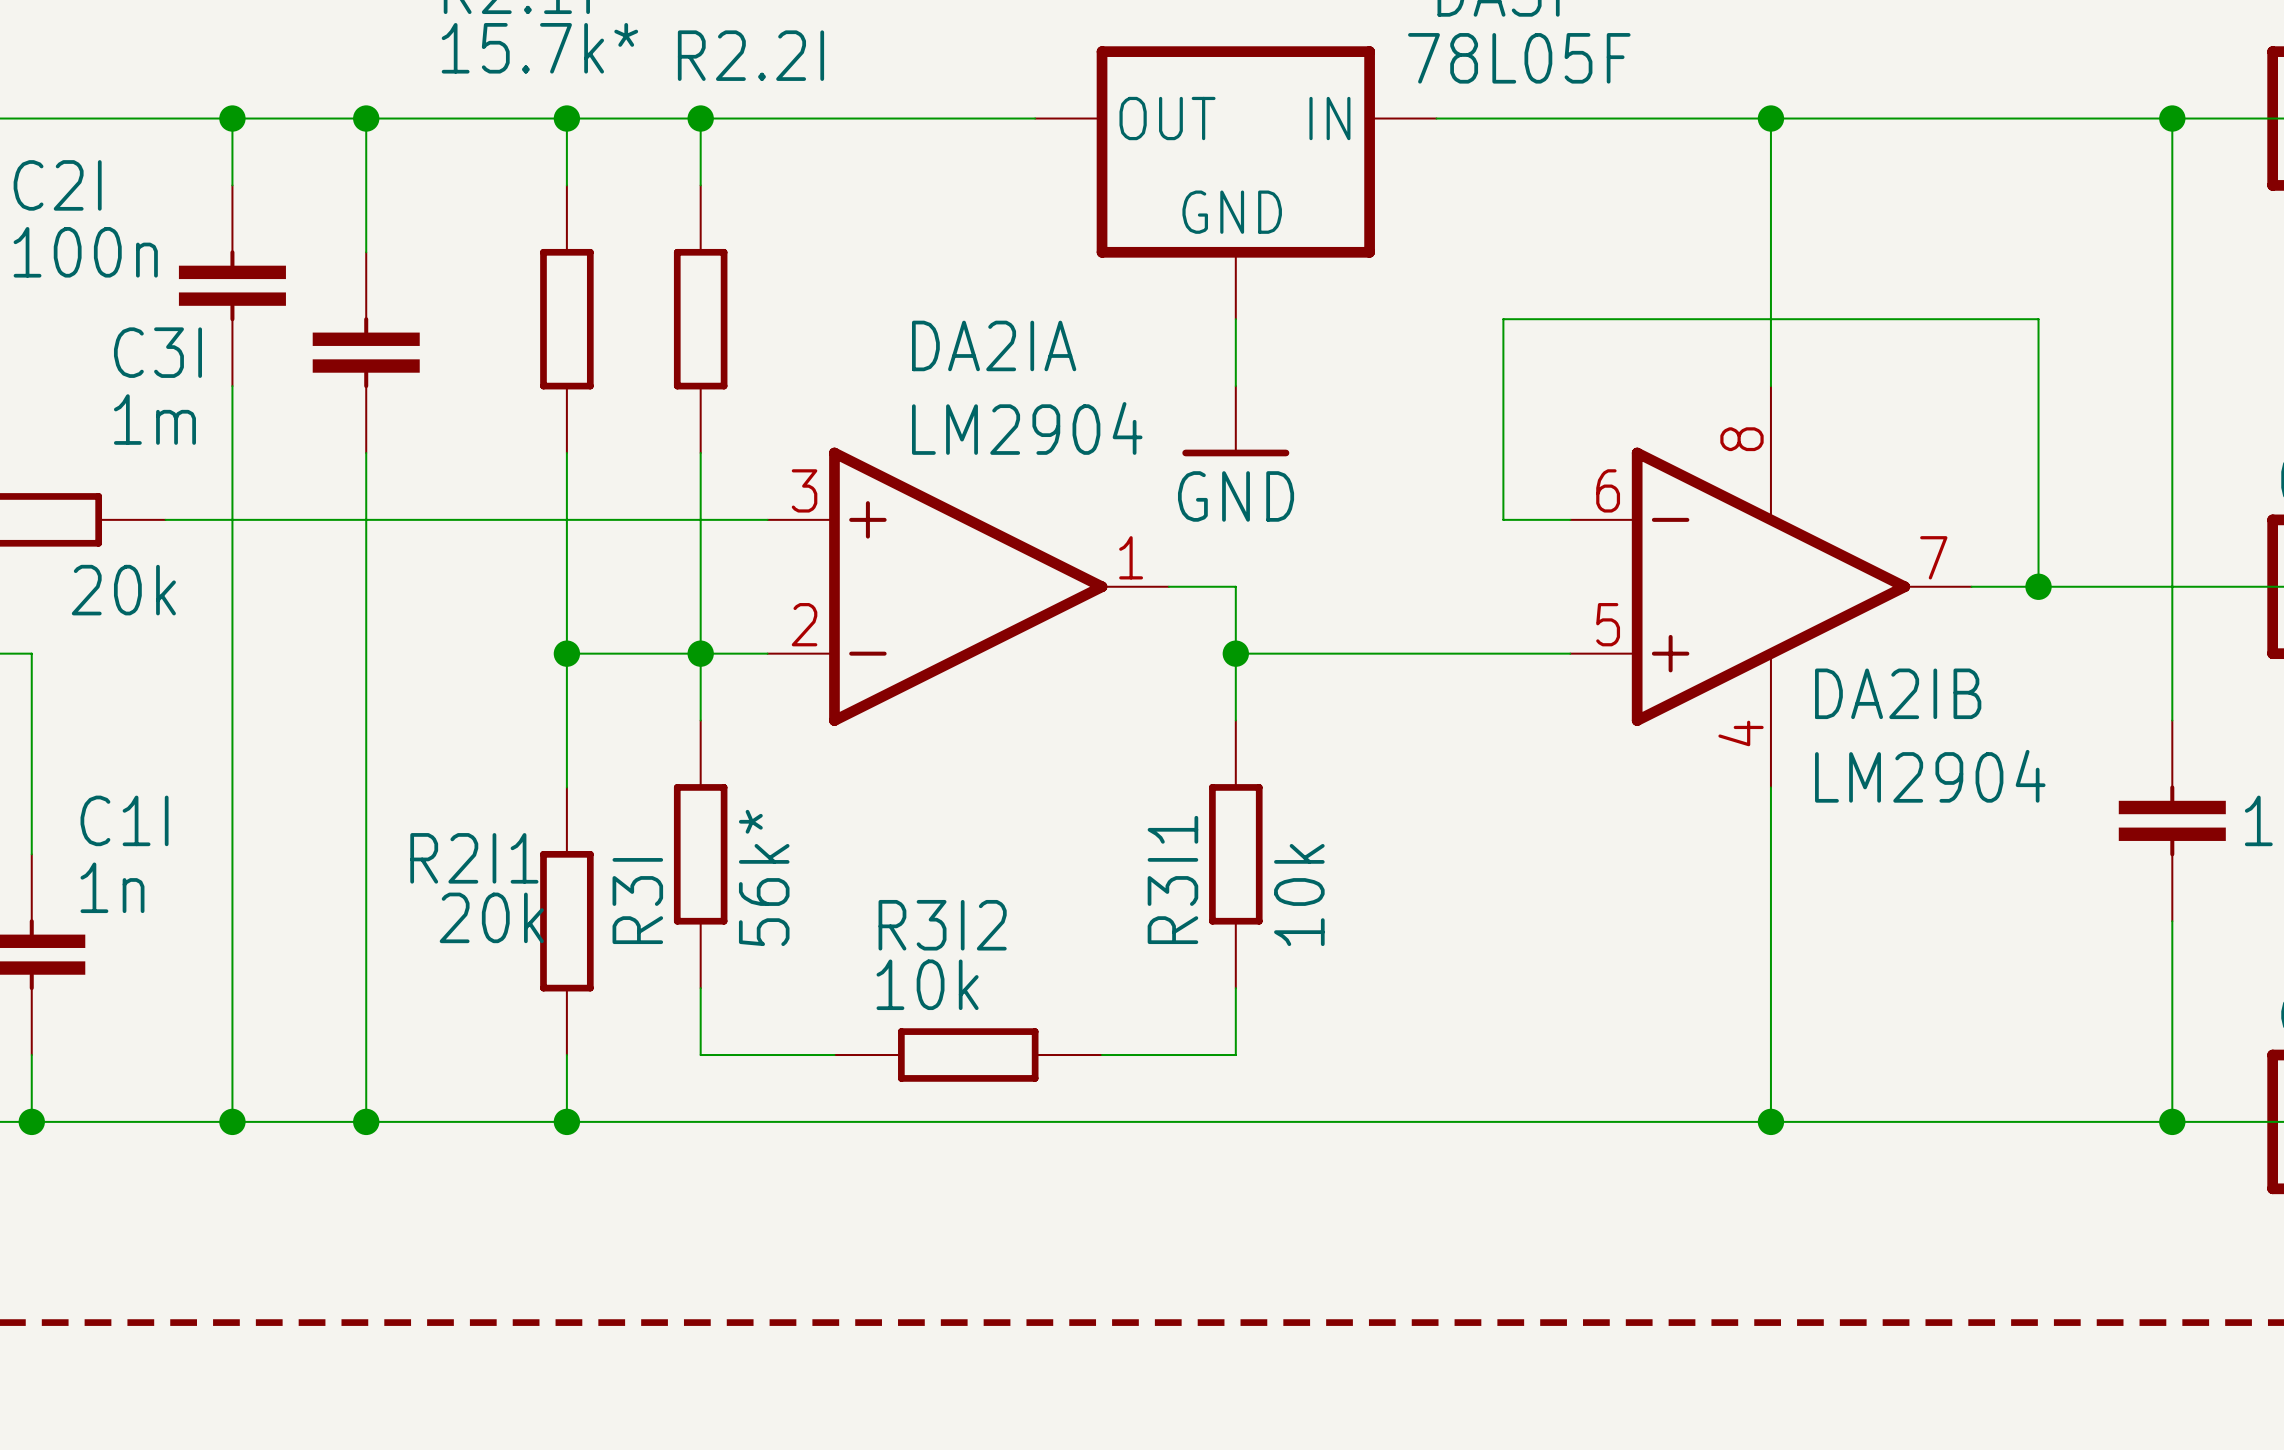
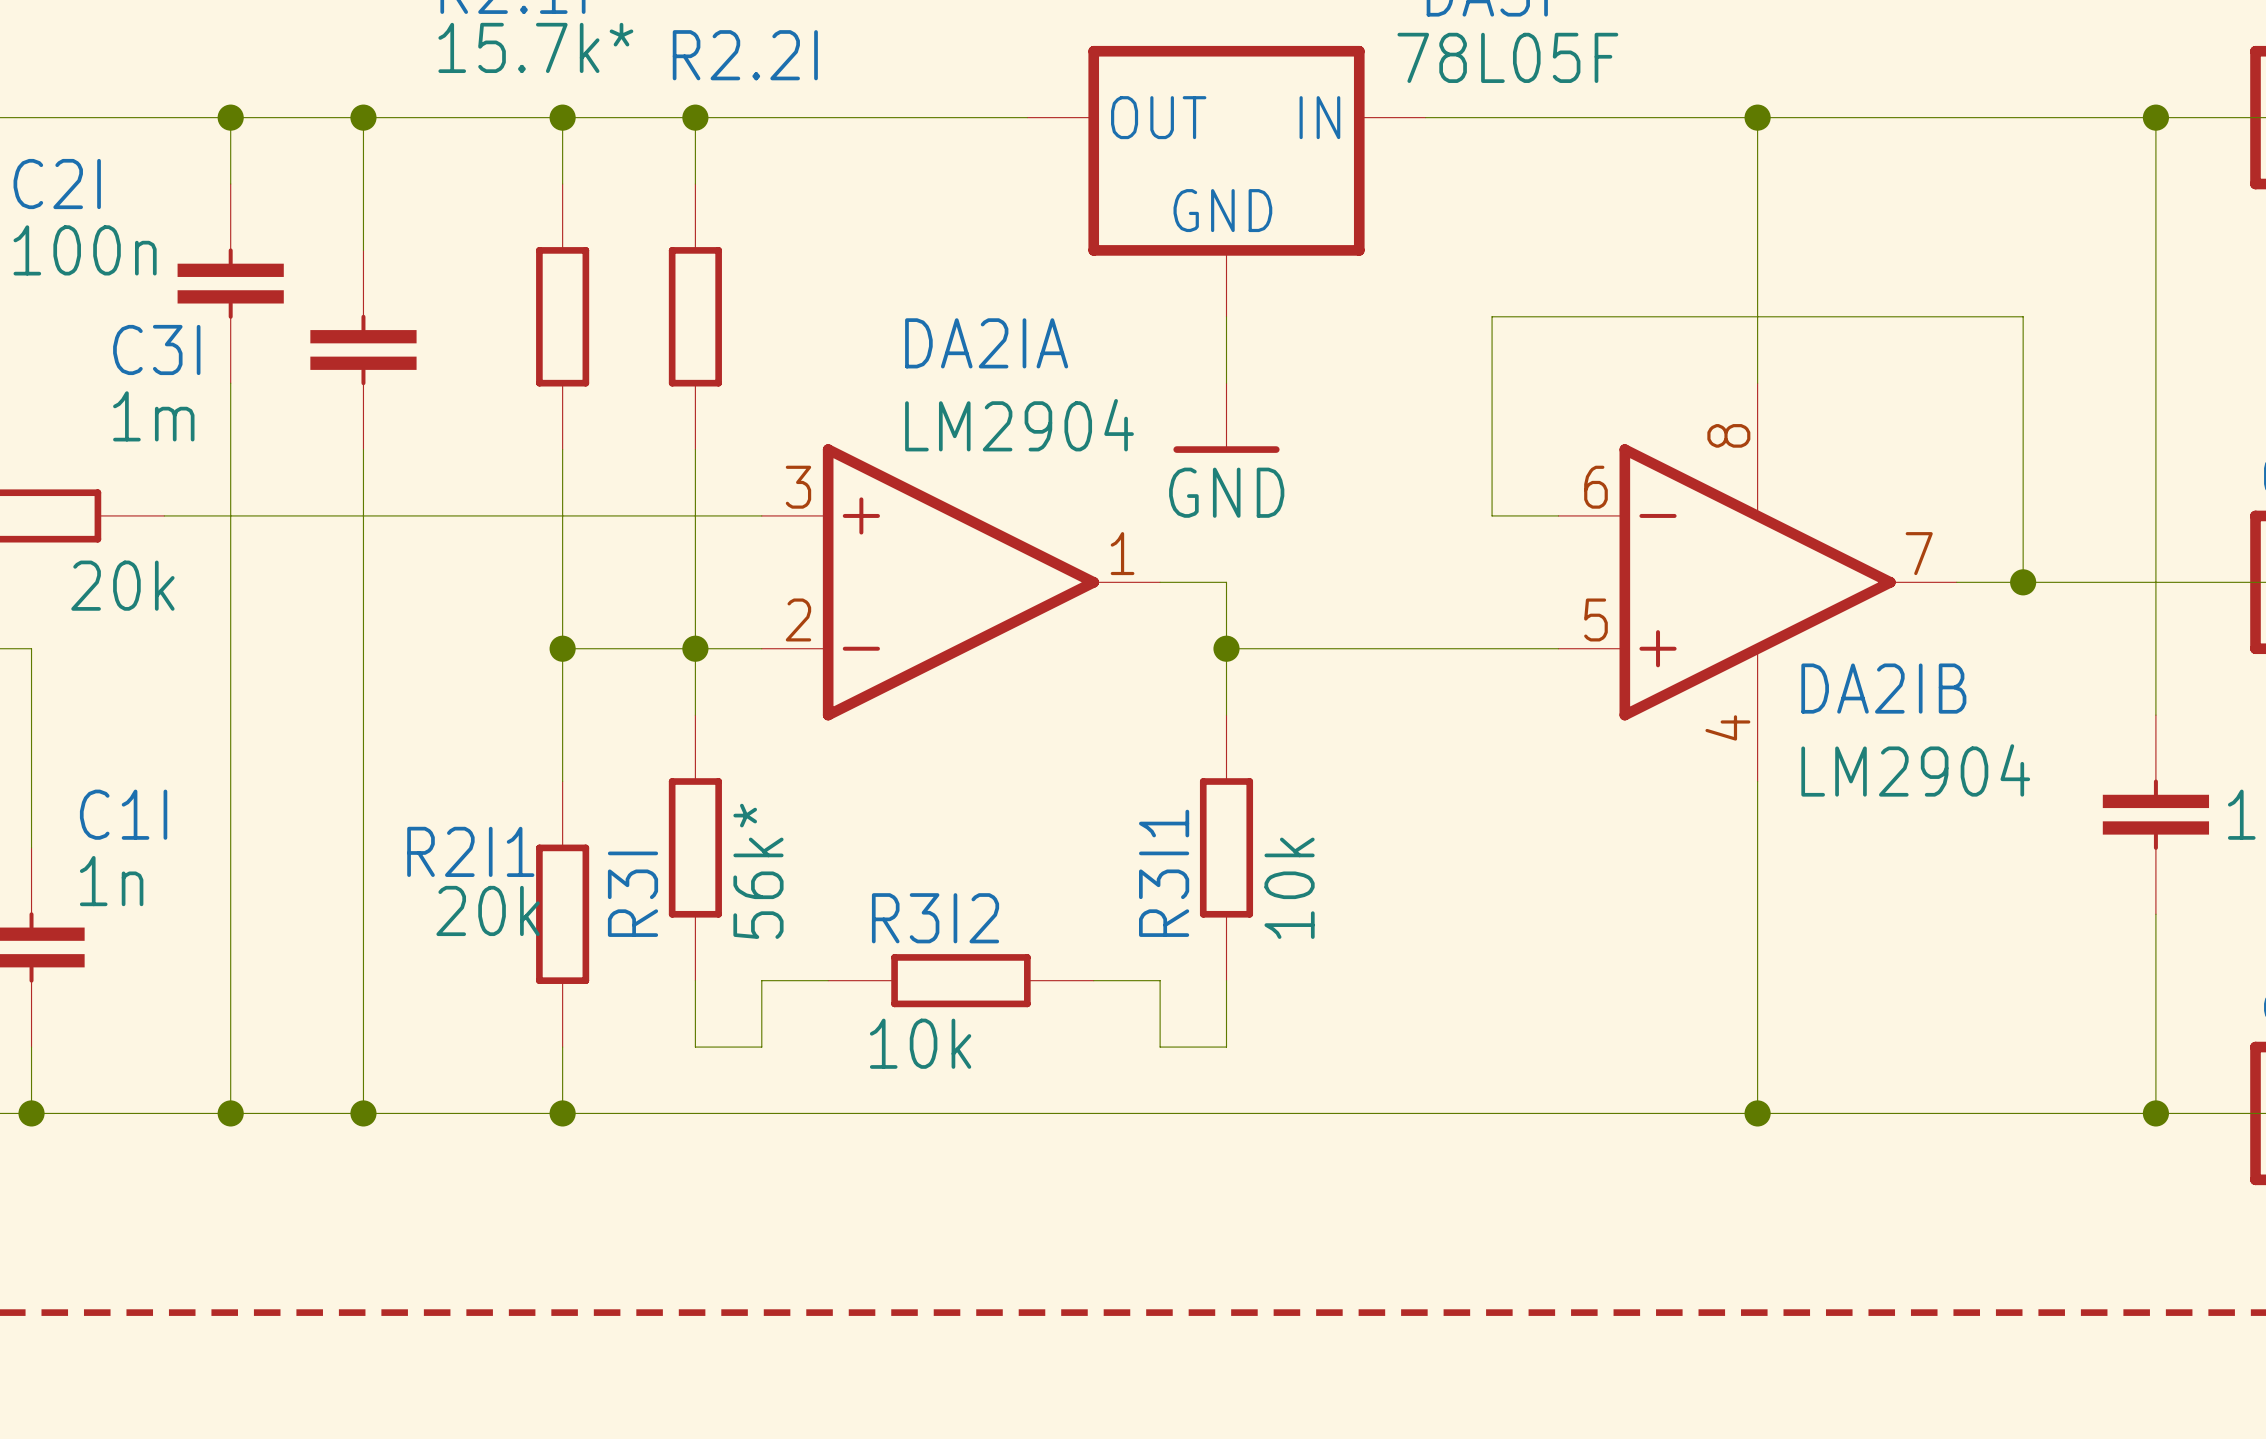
R3I2 value position: 10k (927, 984) -> 10k (920, 1043)
wire: (767, 1055) (834, 1055) -> (761, 1047) (761, 980) (828, 980)
R3I2 position: (968, 1055) -> (960, 980)
wire: (1102, 1055) (1168, 1055) -> (1093, 980) (1160, 980) (1160, 1047)

